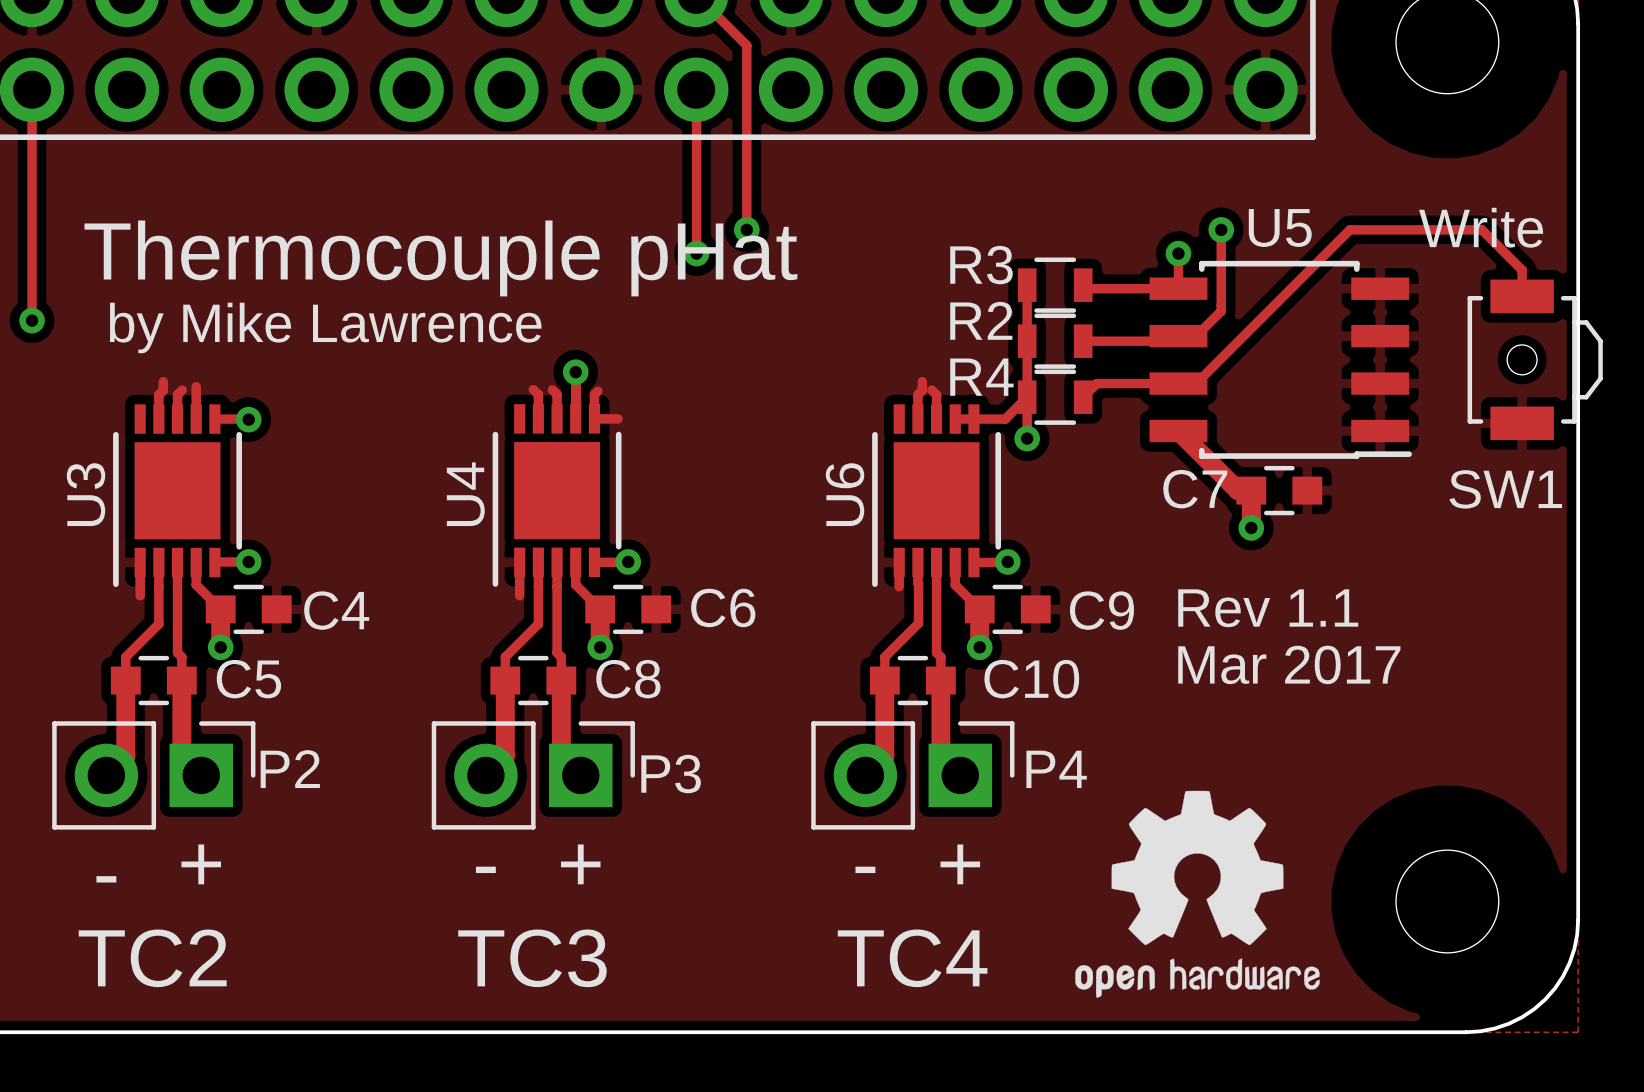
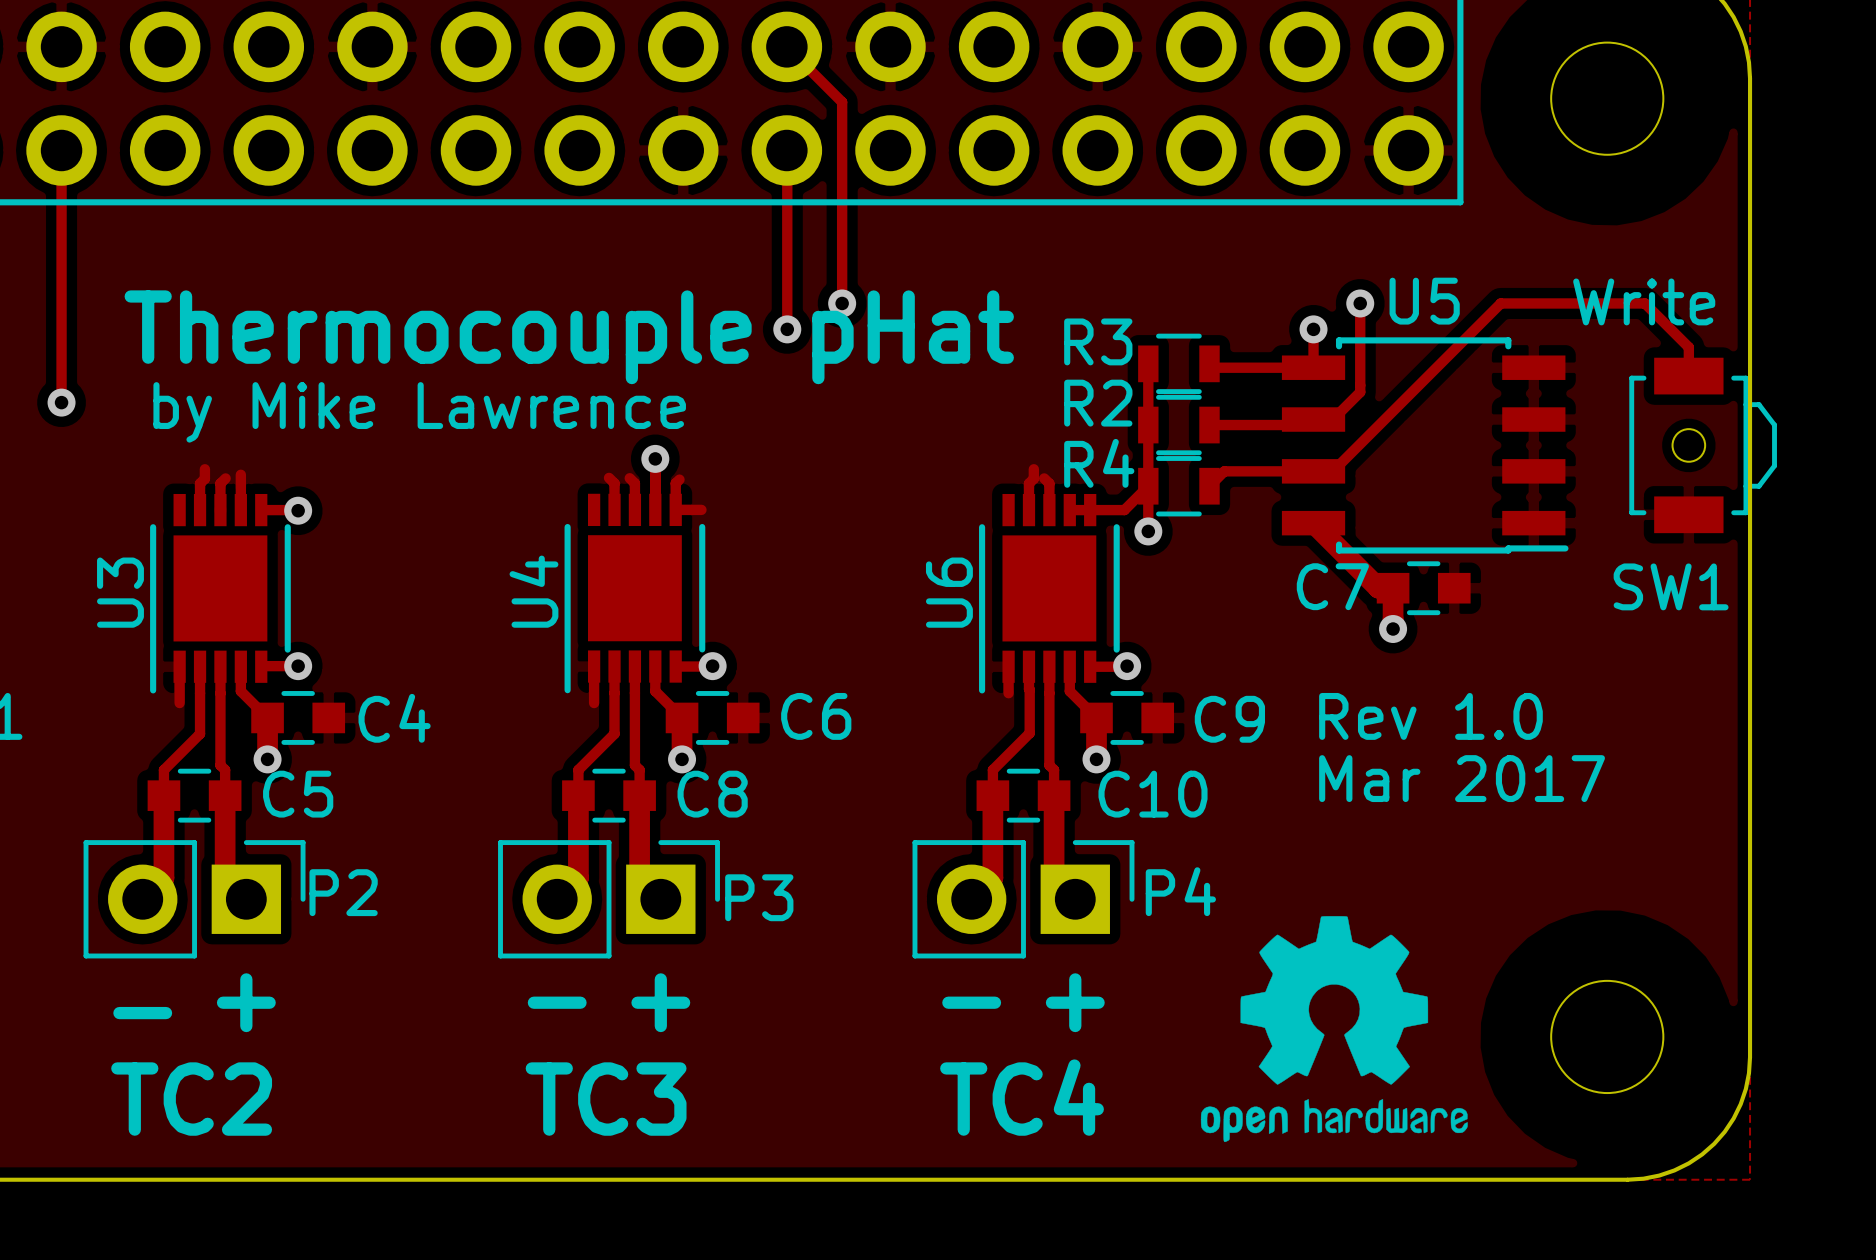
text: Rev 1.1 (1268, 608) -> Rev 1.0 (1430, 716)

